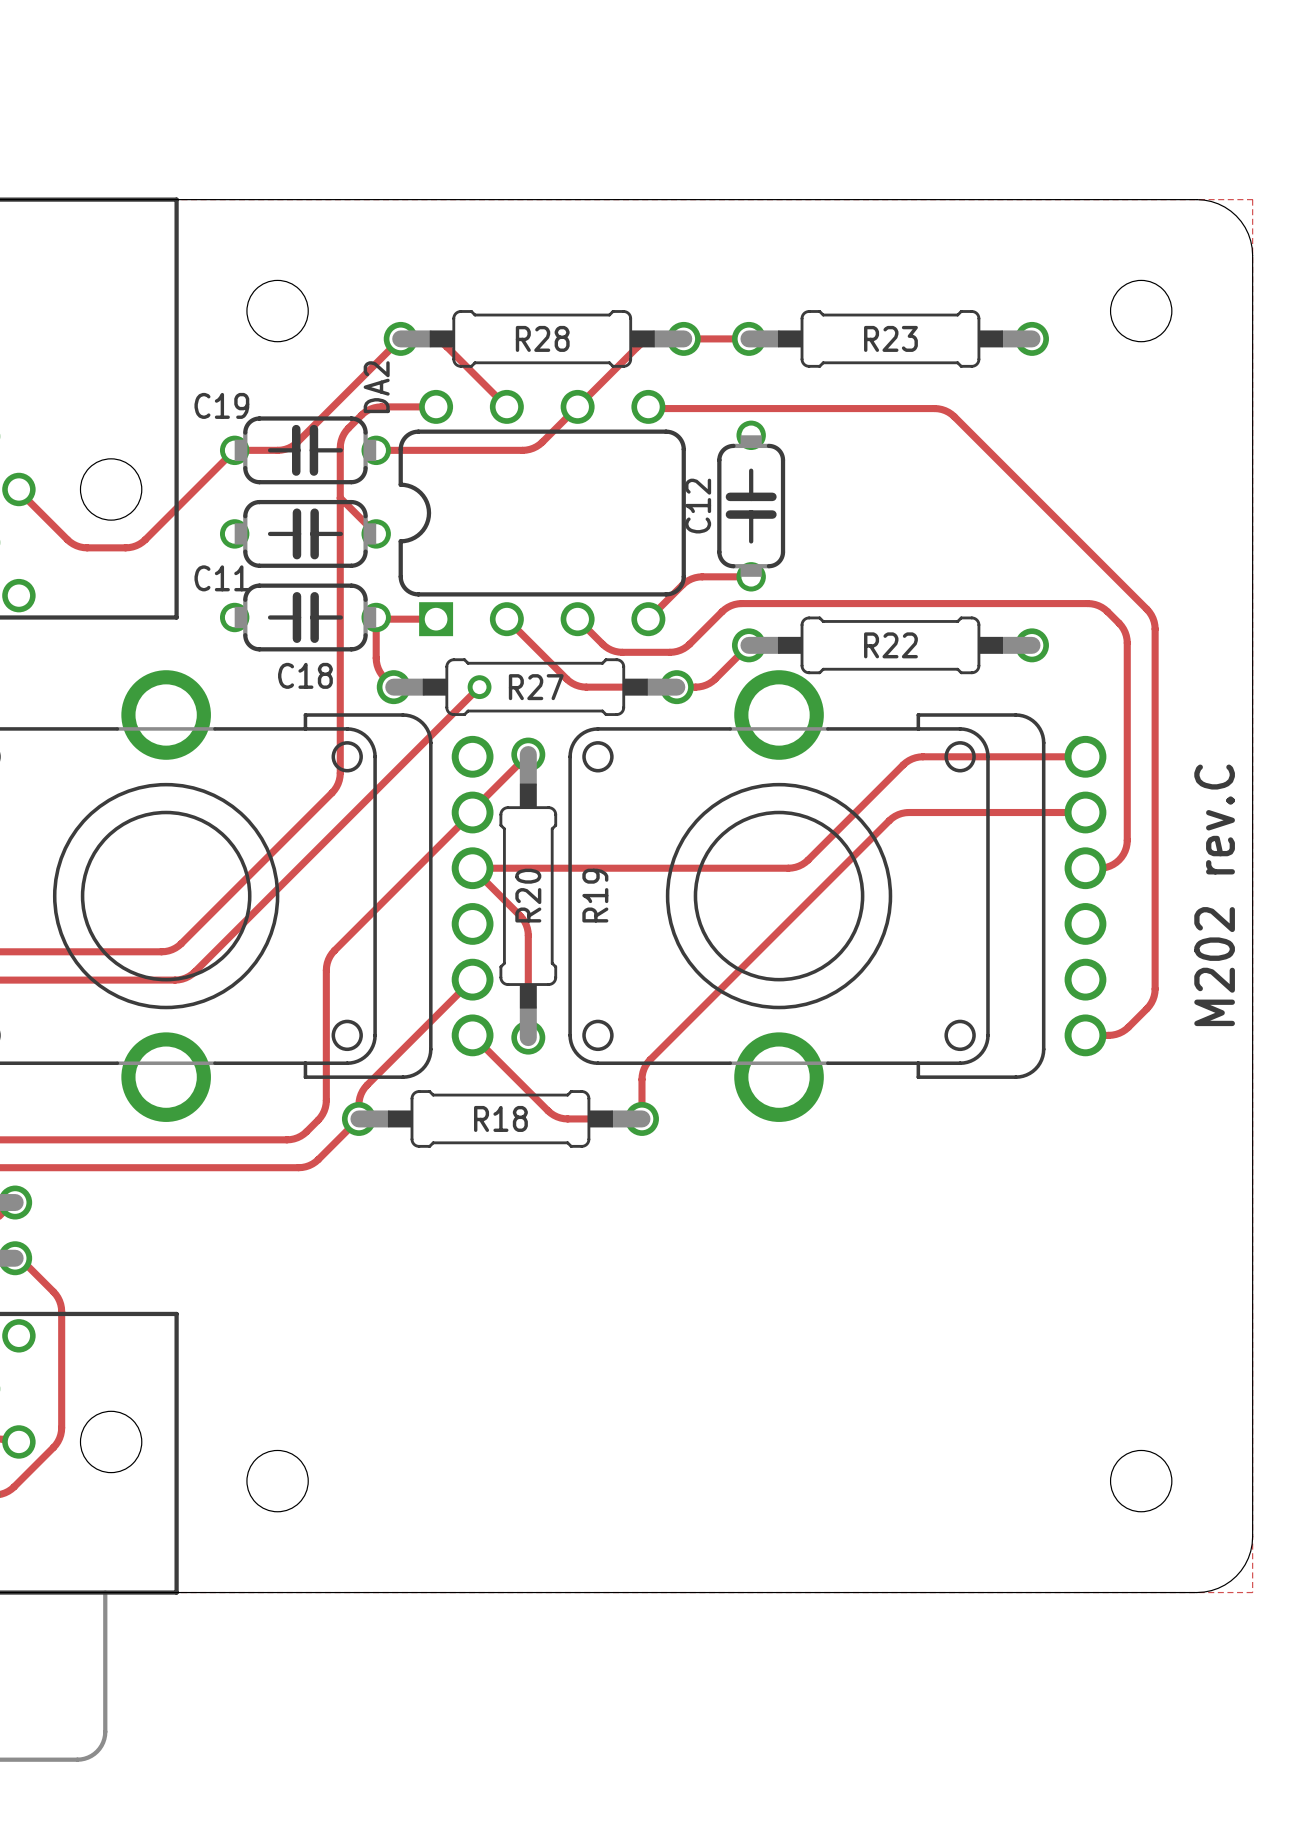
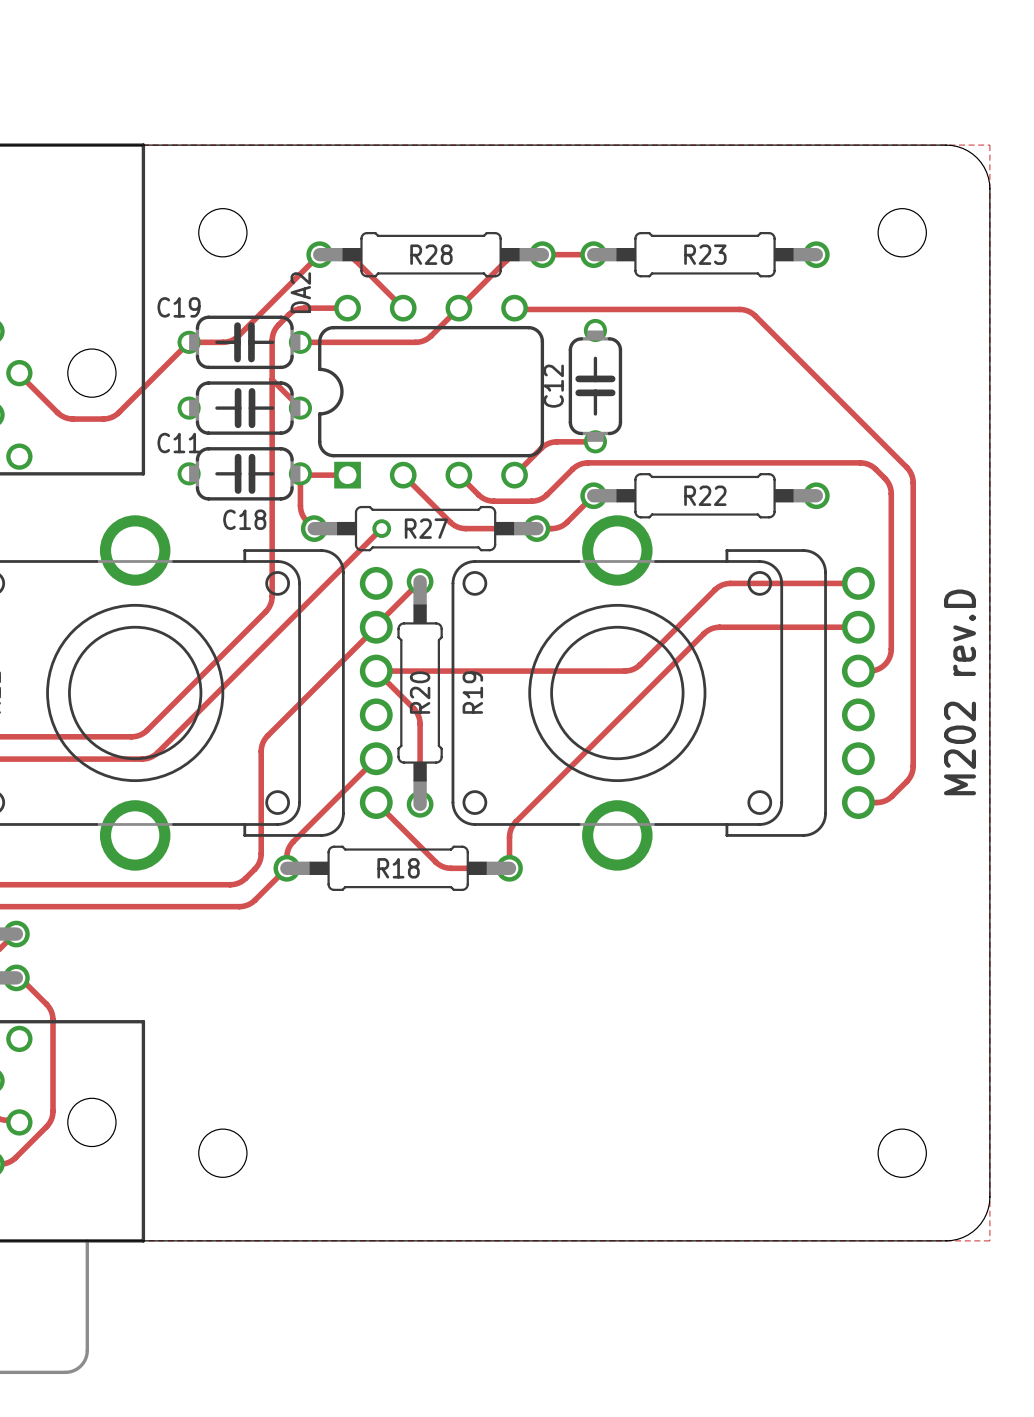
part value: M202 rev.C (1214, 895) -> M202 rev.D (959, 692)

